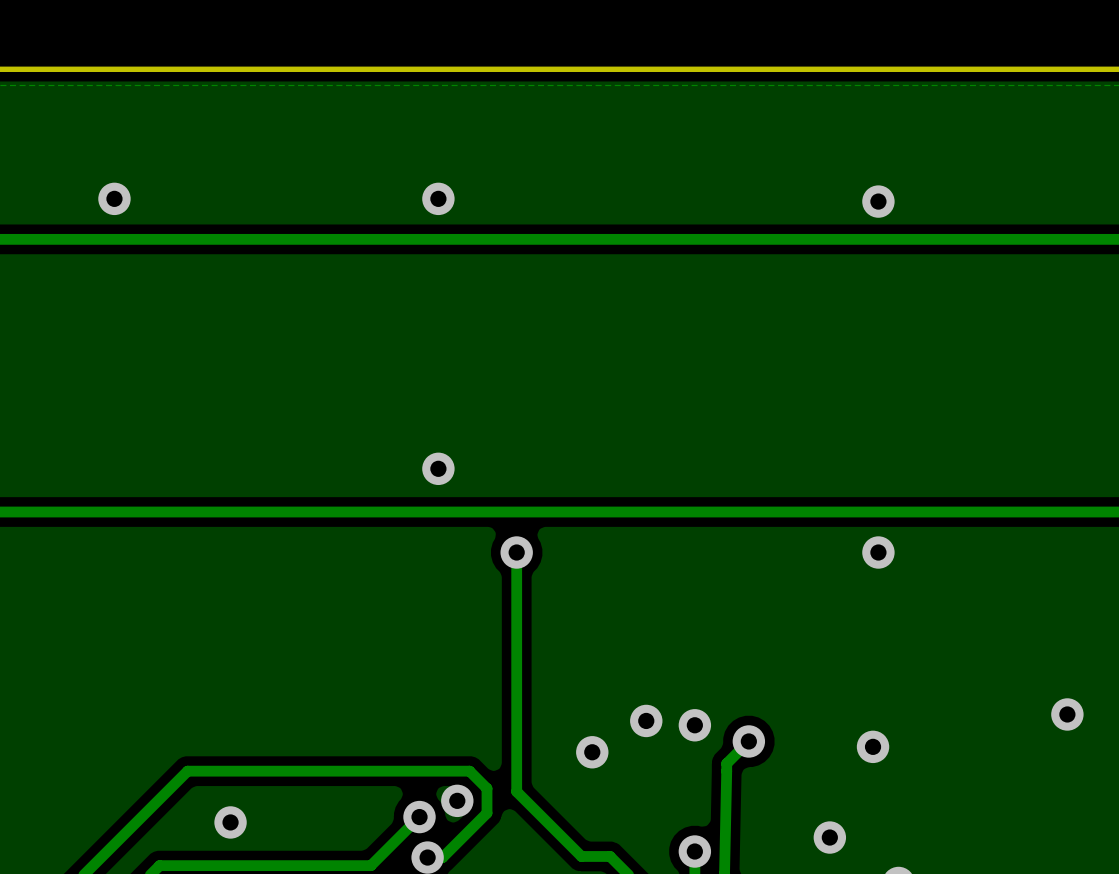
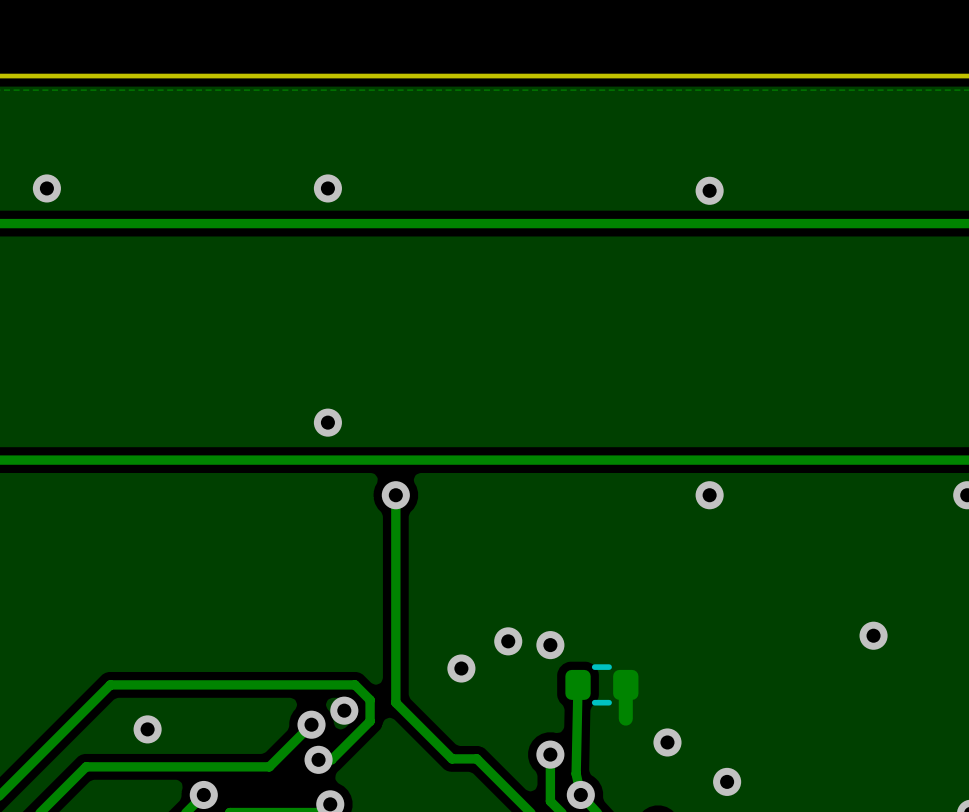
track: (748, 741) (726, 763) (726, 771) -> none
via: (748, 741) -> none
via: (873, 746) -> none
part: none -> (601, 684)
track: none -> (625, 684) (625, 718)

